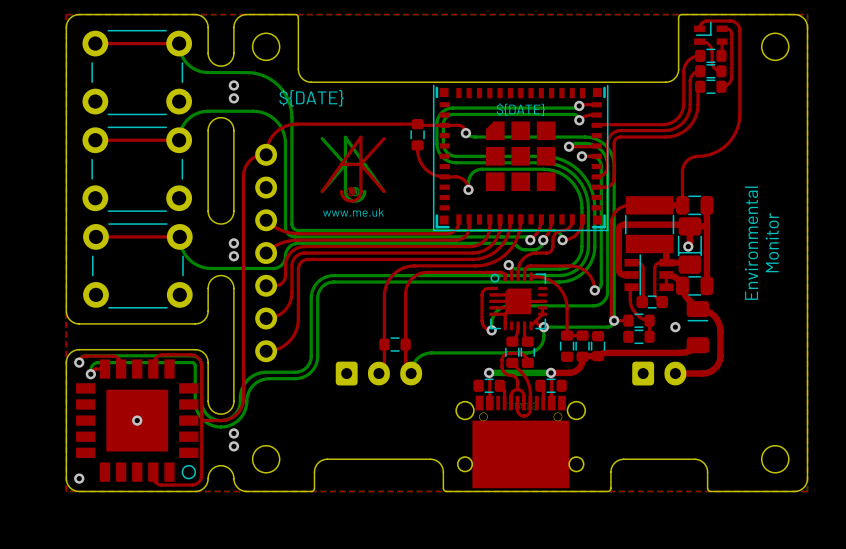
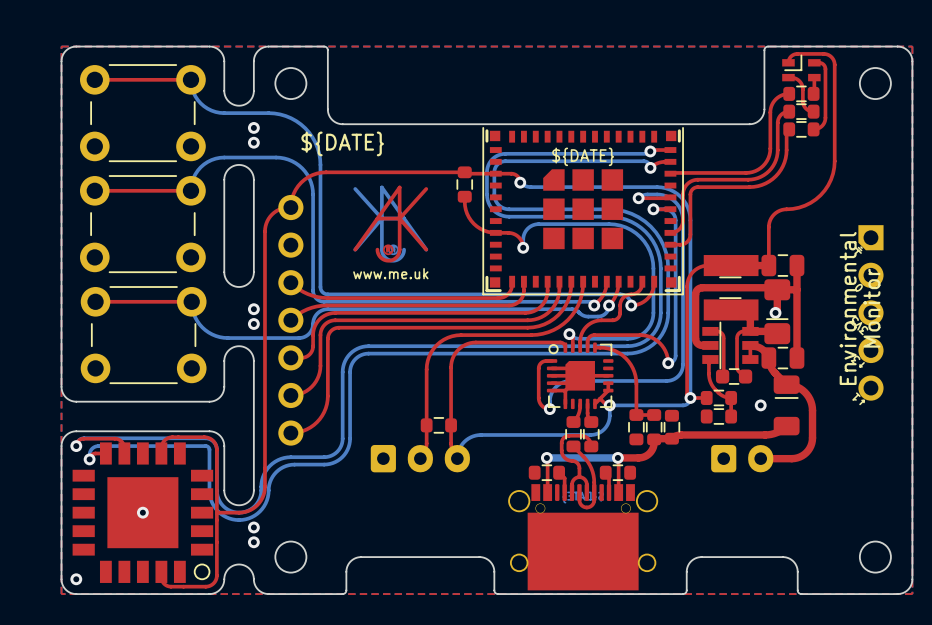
part footprint: [615, 195, 714, 309] -> [691, 254, 805, 384]
drawing: none -> [777, 254, 789, 277]
drawing: none -> [719, 276, 742, 299]
part: none -> (870, 312)
drawing: none -> [766, 318, 789, 321]
drawing: none -> [777, 346, 789, 370]
drawing: none -> [728, 368, 740, 385]

